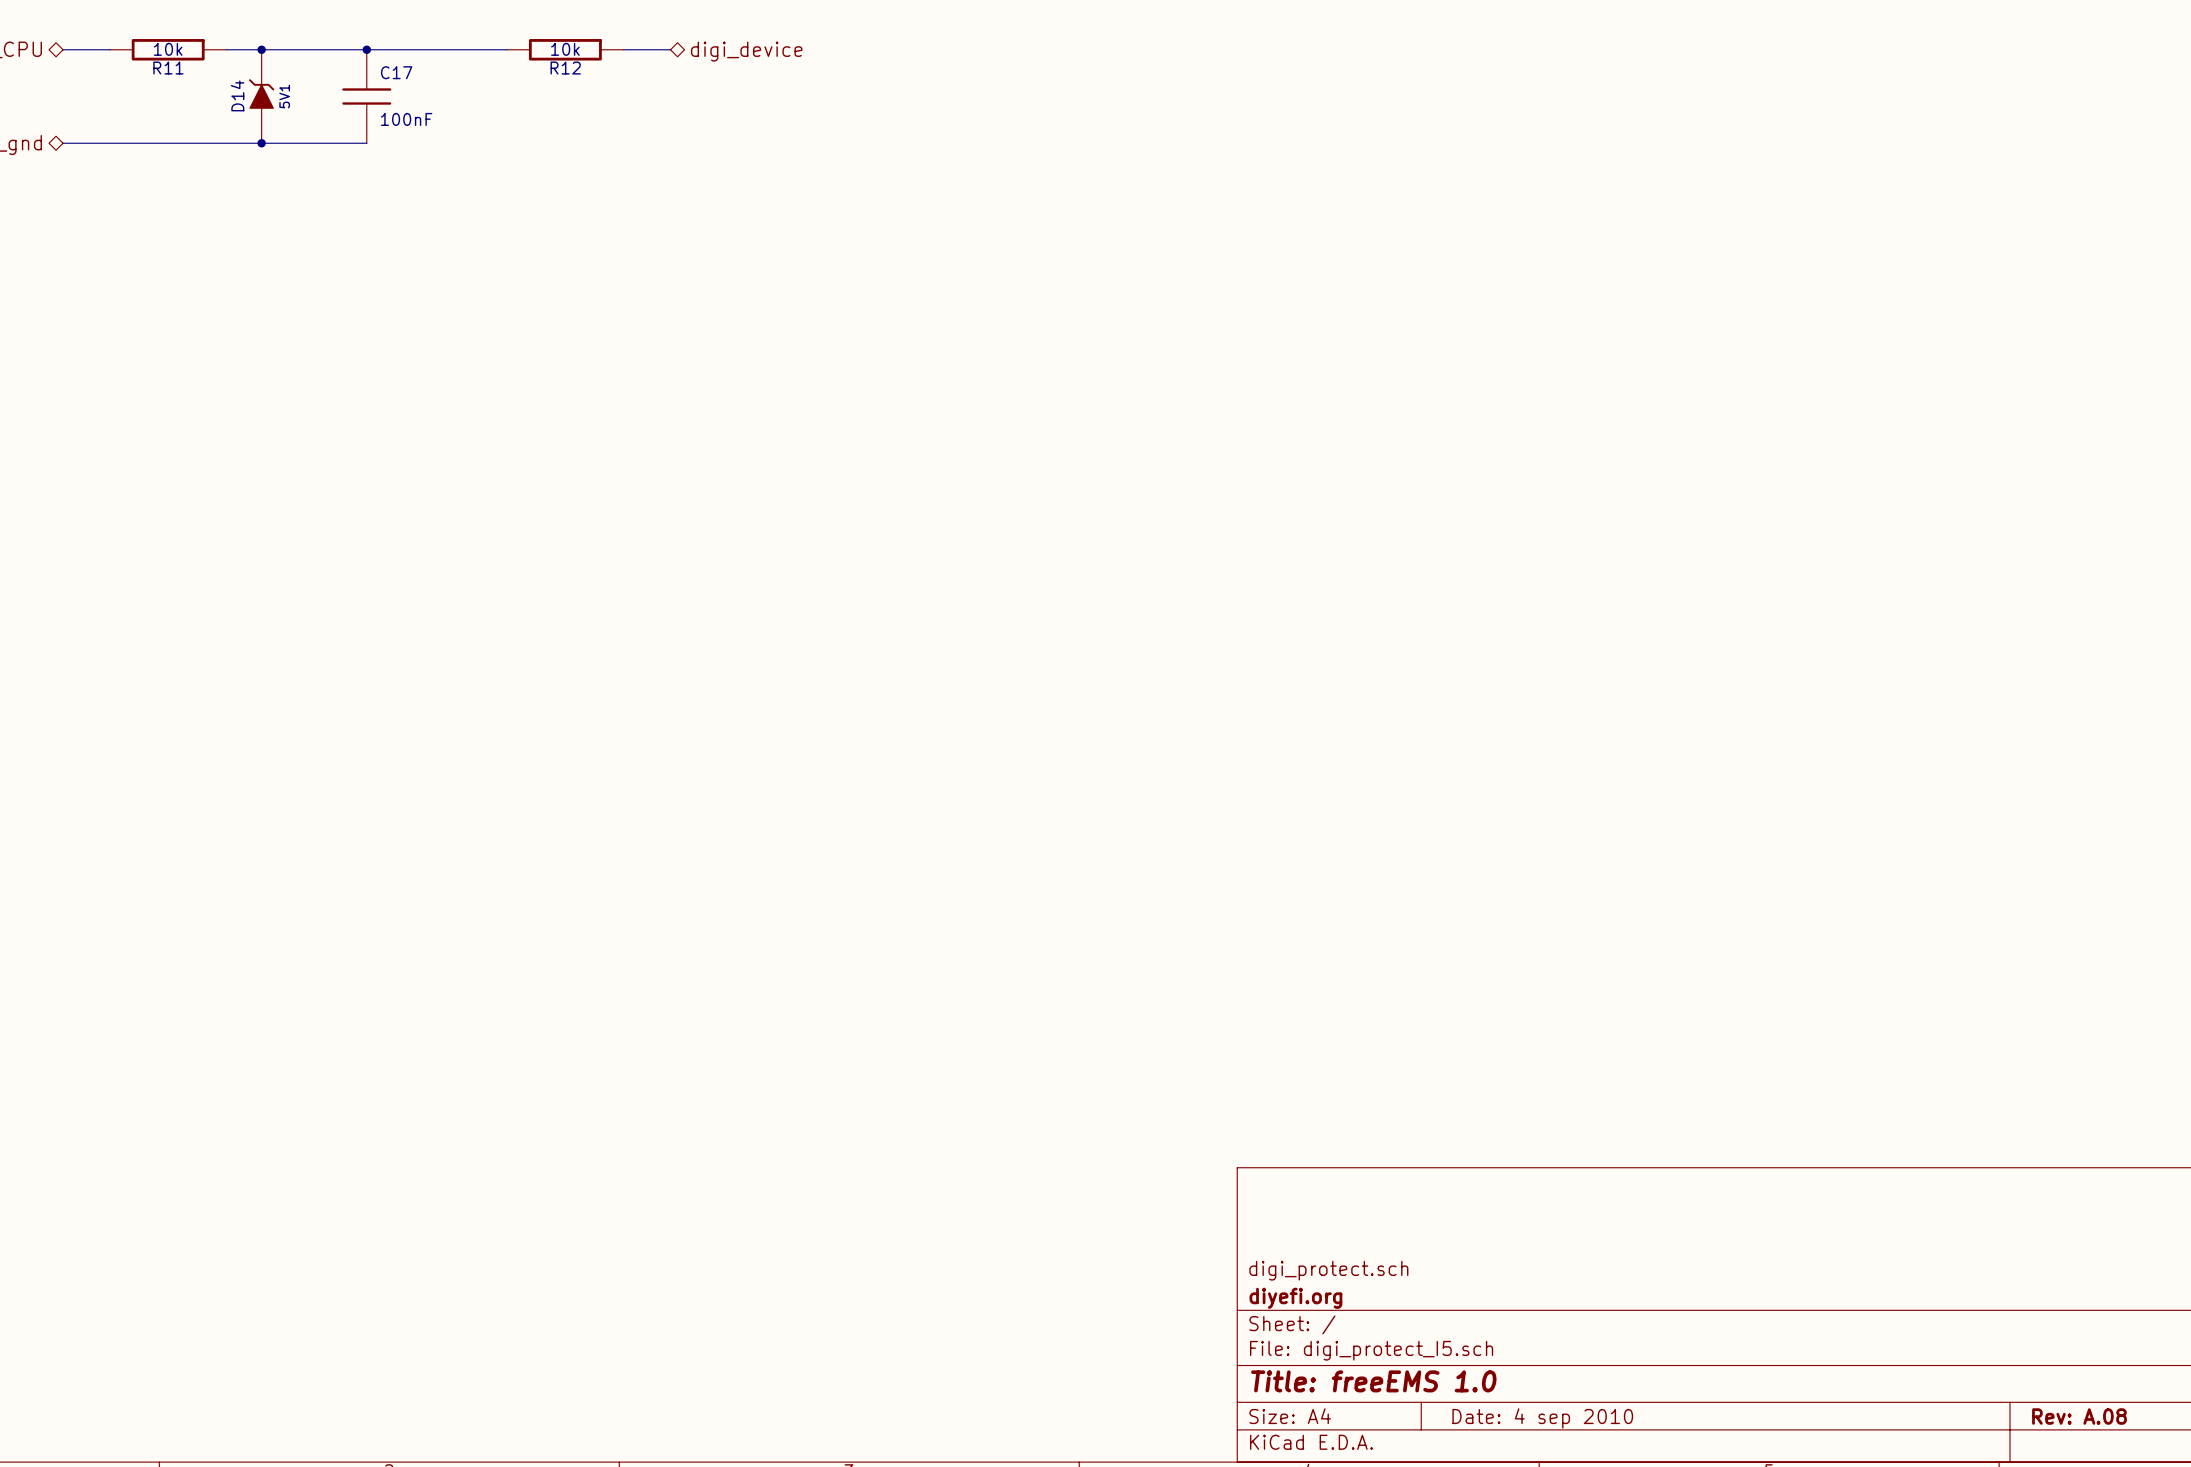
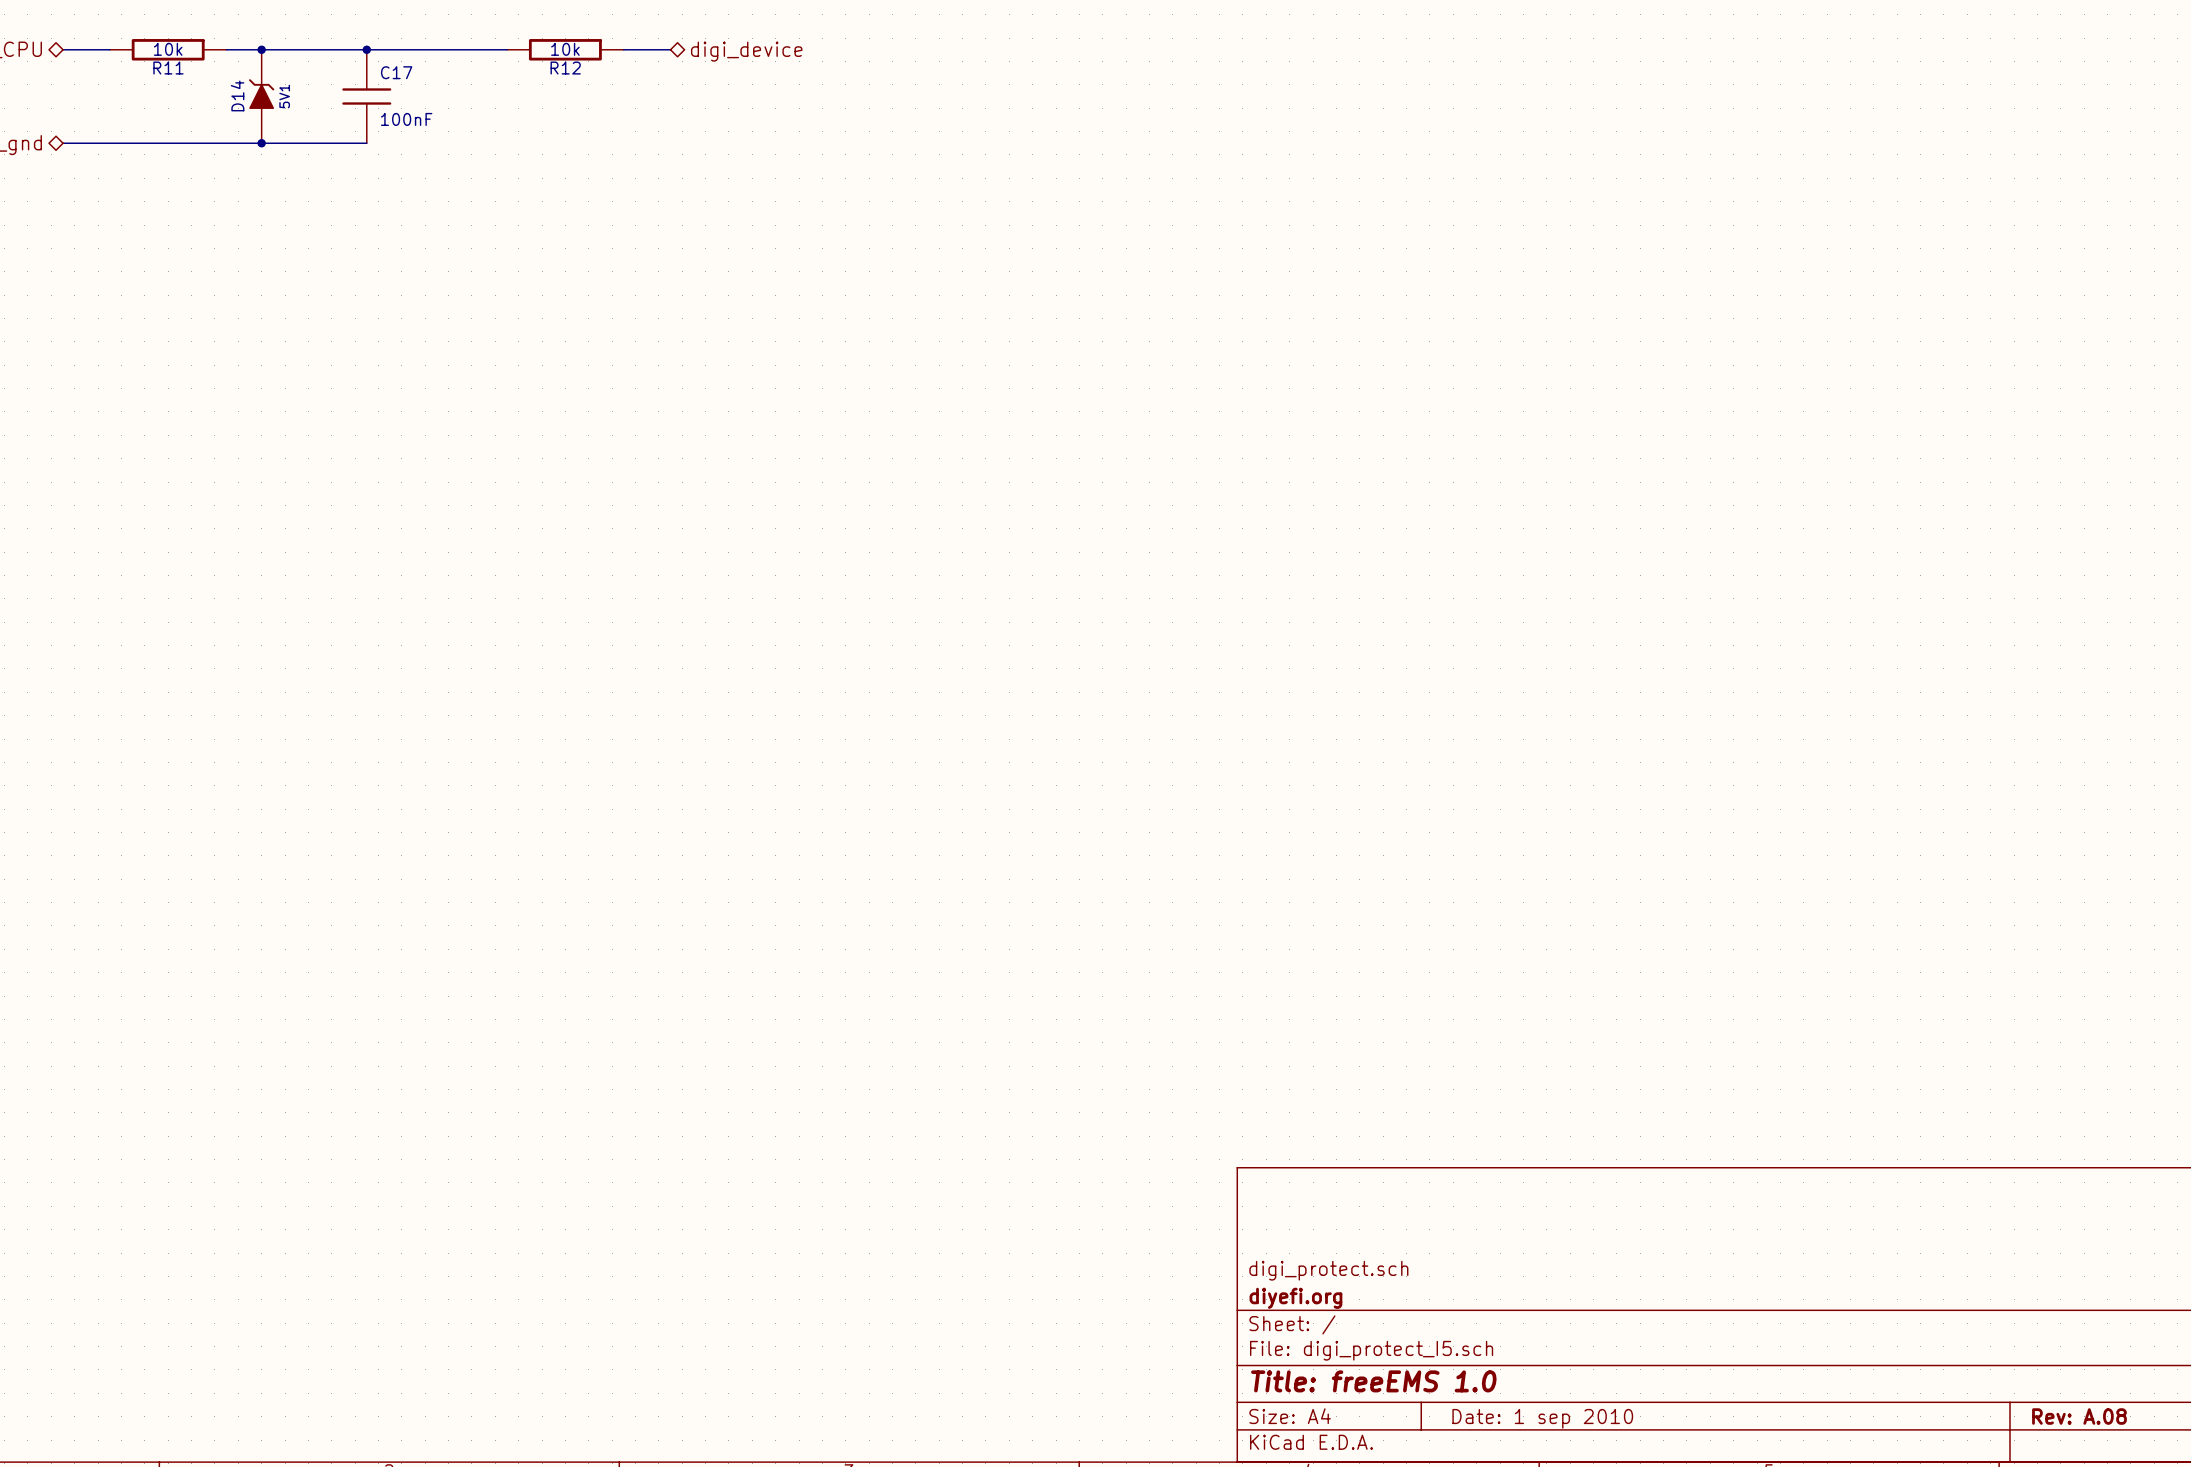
title block: Date: 4 sep 2010 (1542, 1418) -> Date: 1 sep 2010 (1542, 1418)

